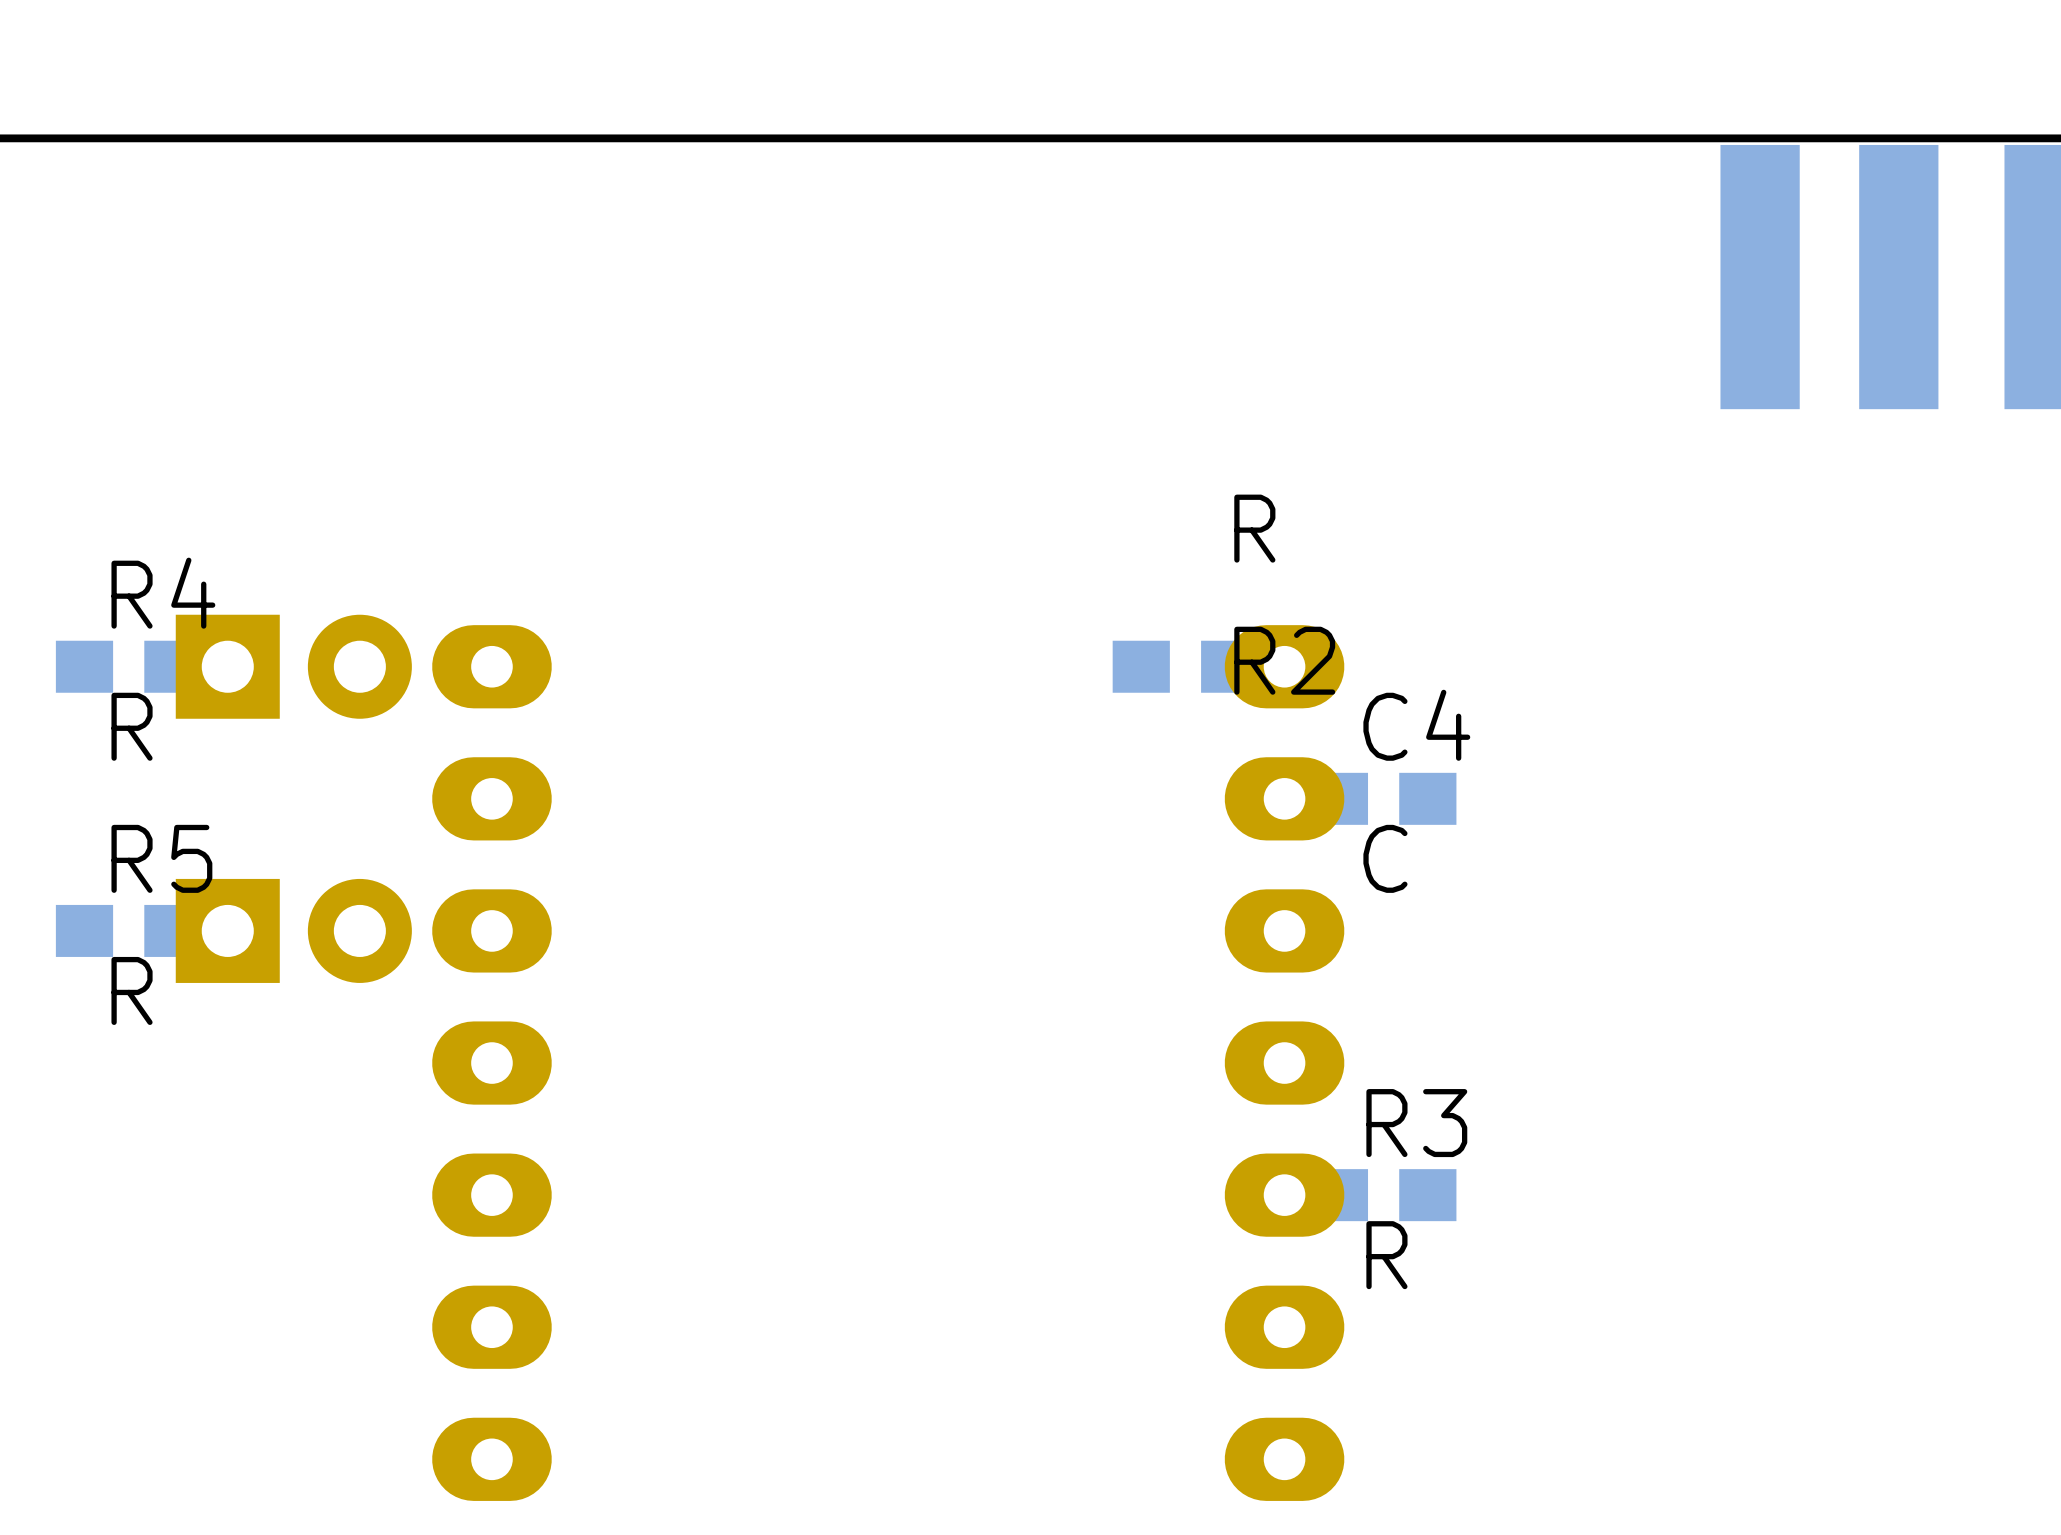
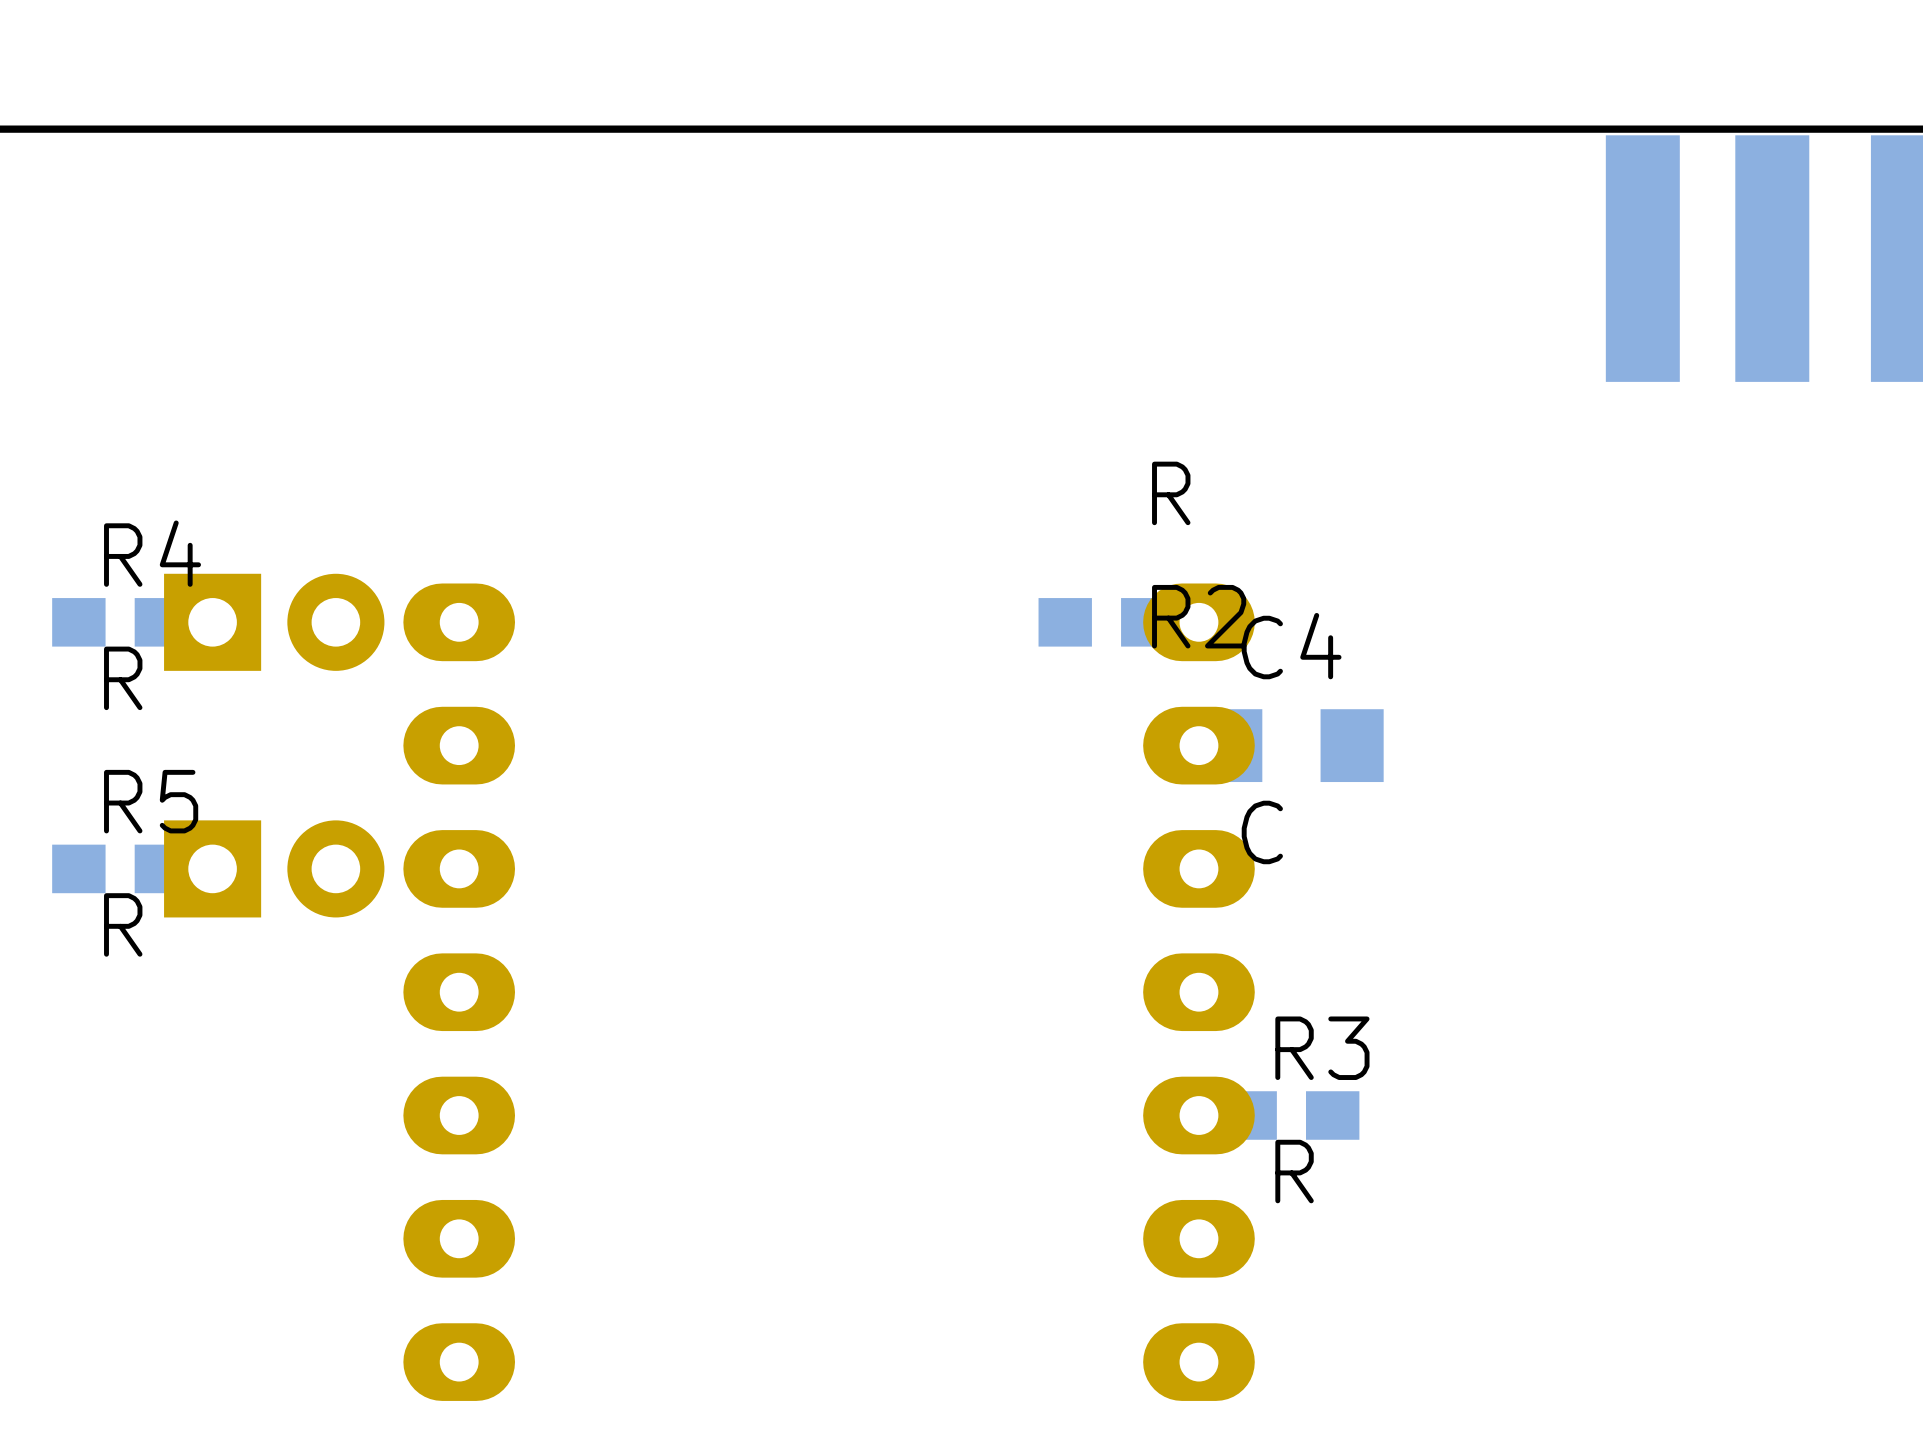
C4 name position: C4 (1416, 725) -> C4 (1291, 646)
C4 footprint: [1310, 772, 1457, 825] -> [1199, 709, 1384, 783]
C4 value position: C (1385, 858) -> C (1262, 832)

